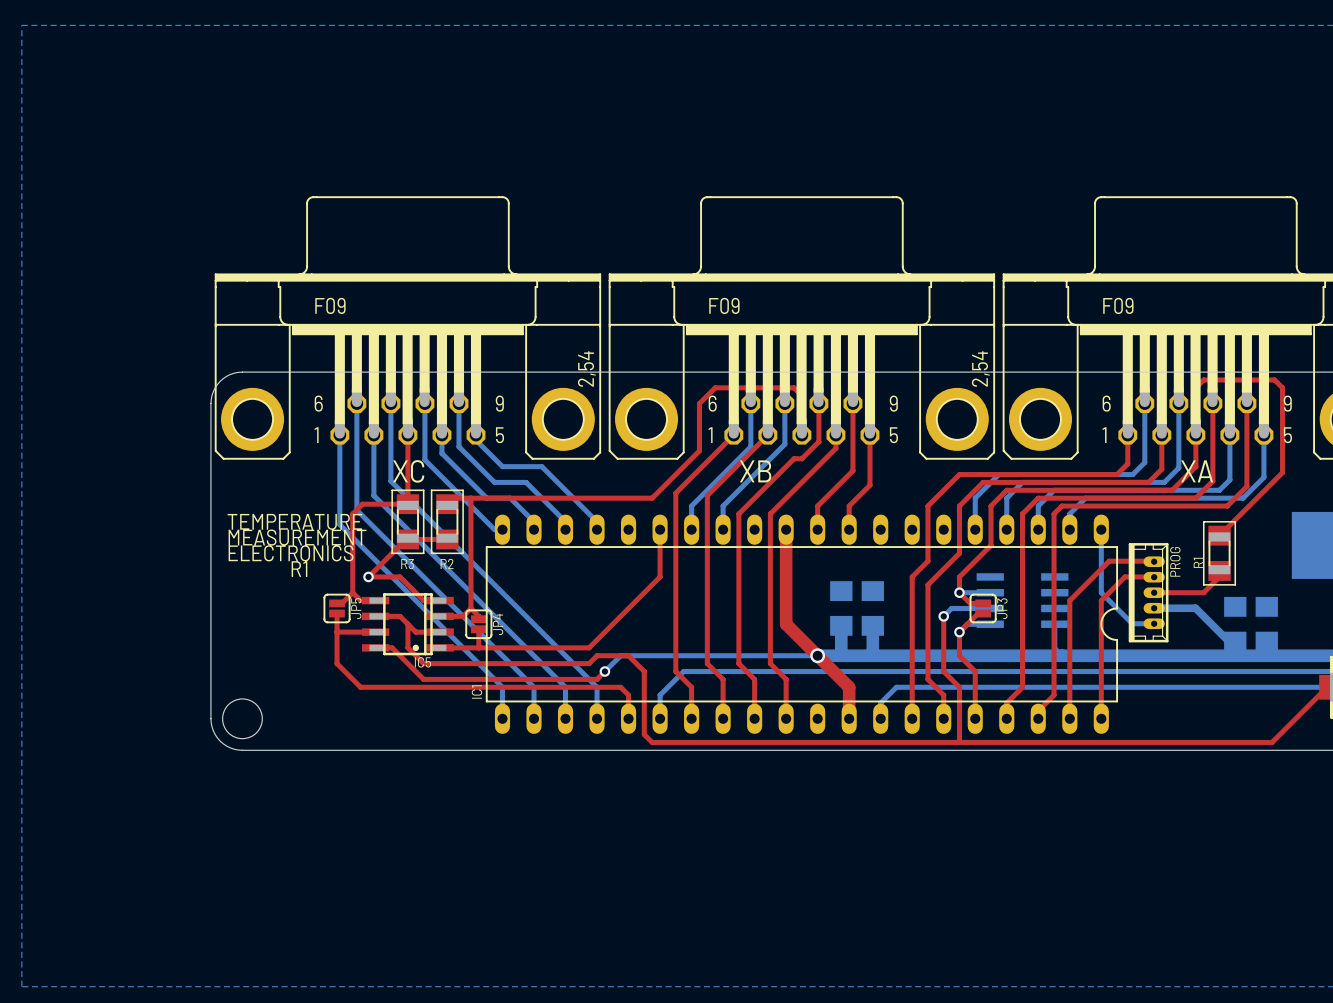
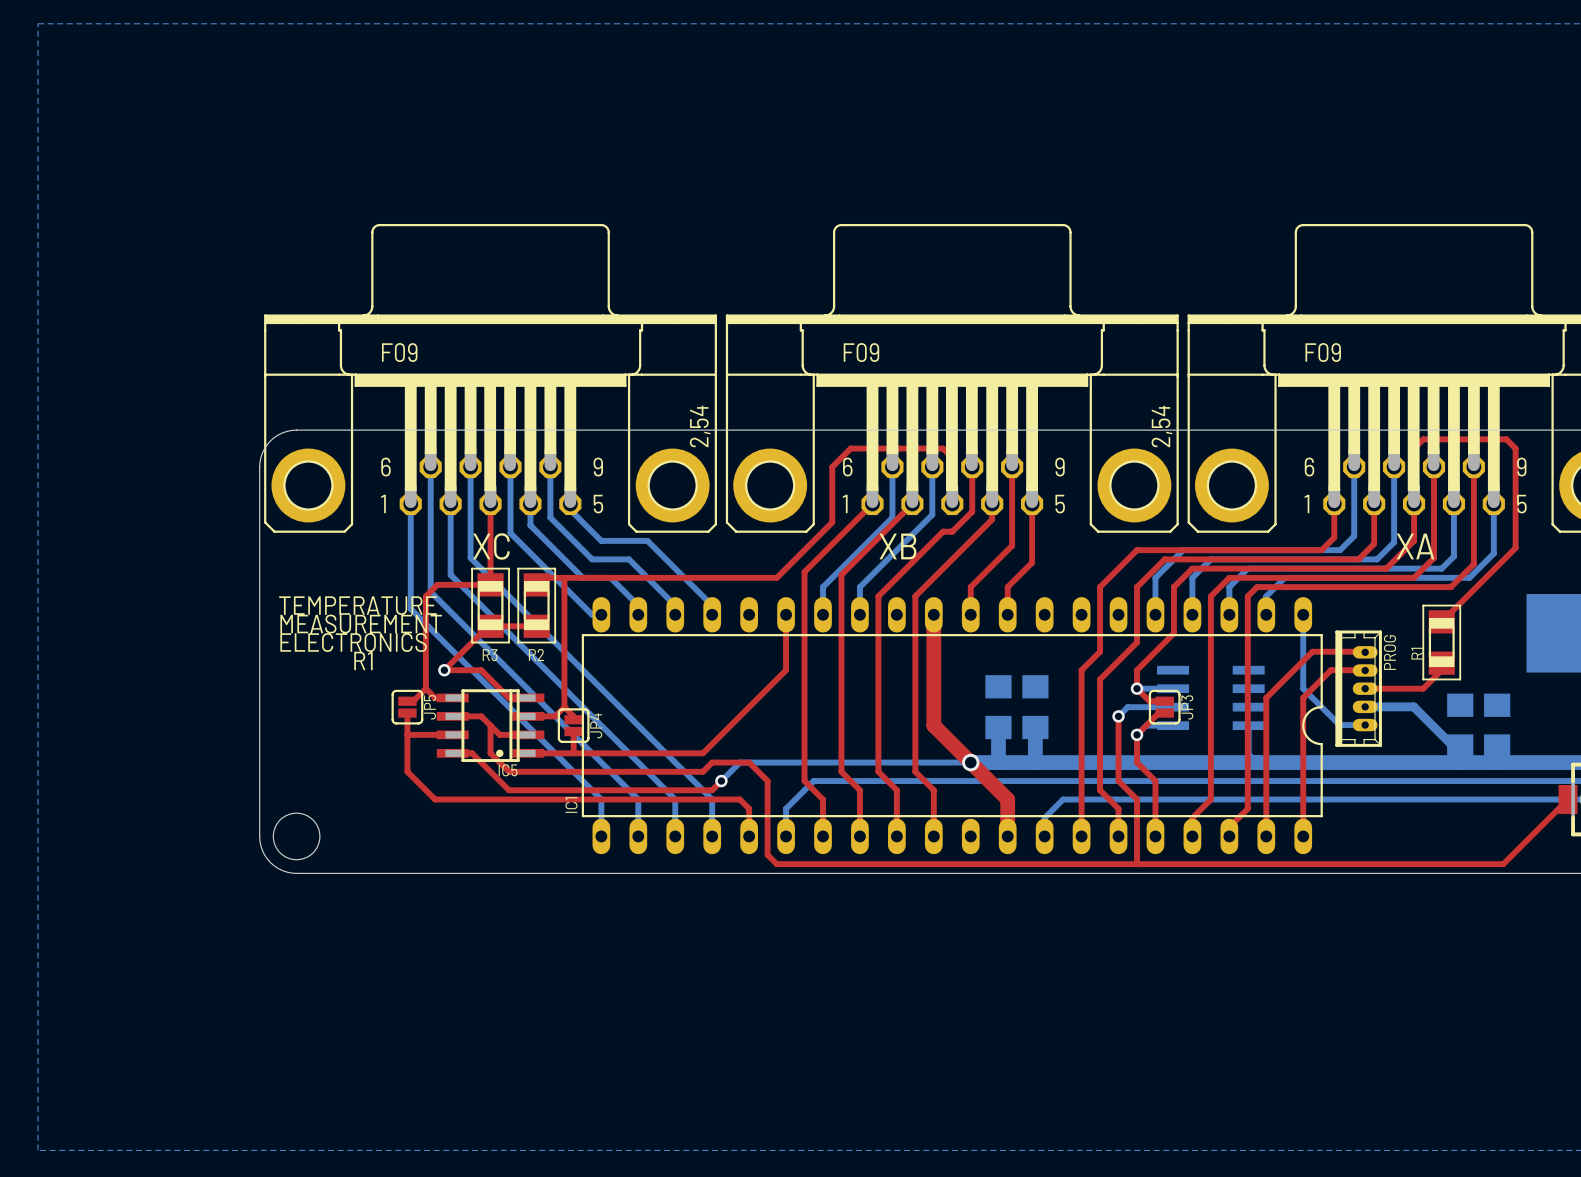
R3 footprint: [391, 489, 425, 555] -> [471, 567, 510, 644]
R2 footprint: [430, 489, 464, 555] -> [517, 567, 557, 644]
R1 footprint: [1202, 521, 1237, 586] -> [1422, 604, 1462, 681]

